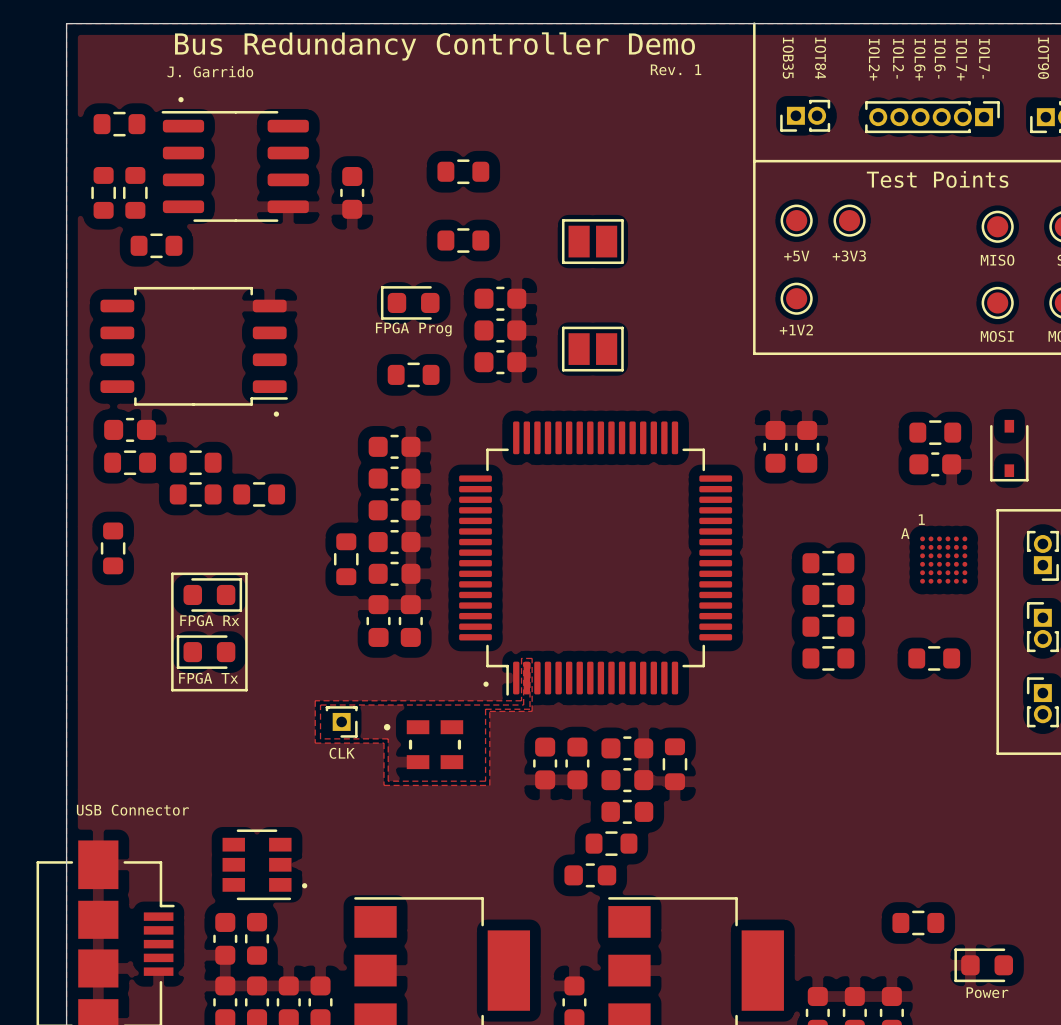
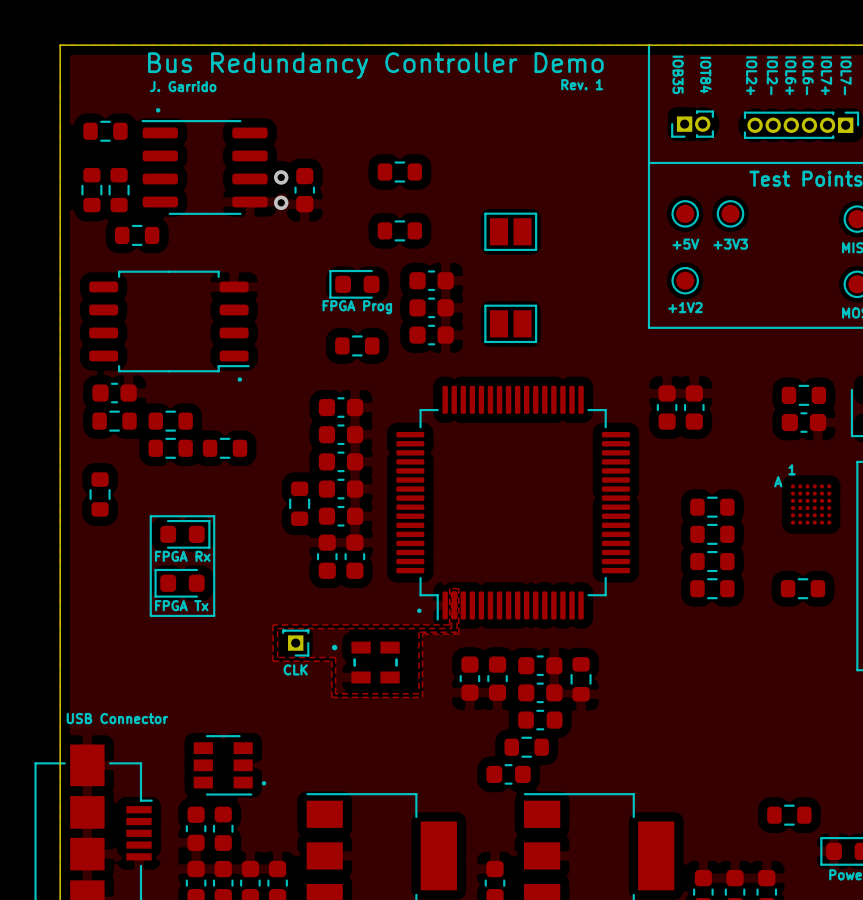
via: none -> (281, 177)
via: none -> (281, 202)

